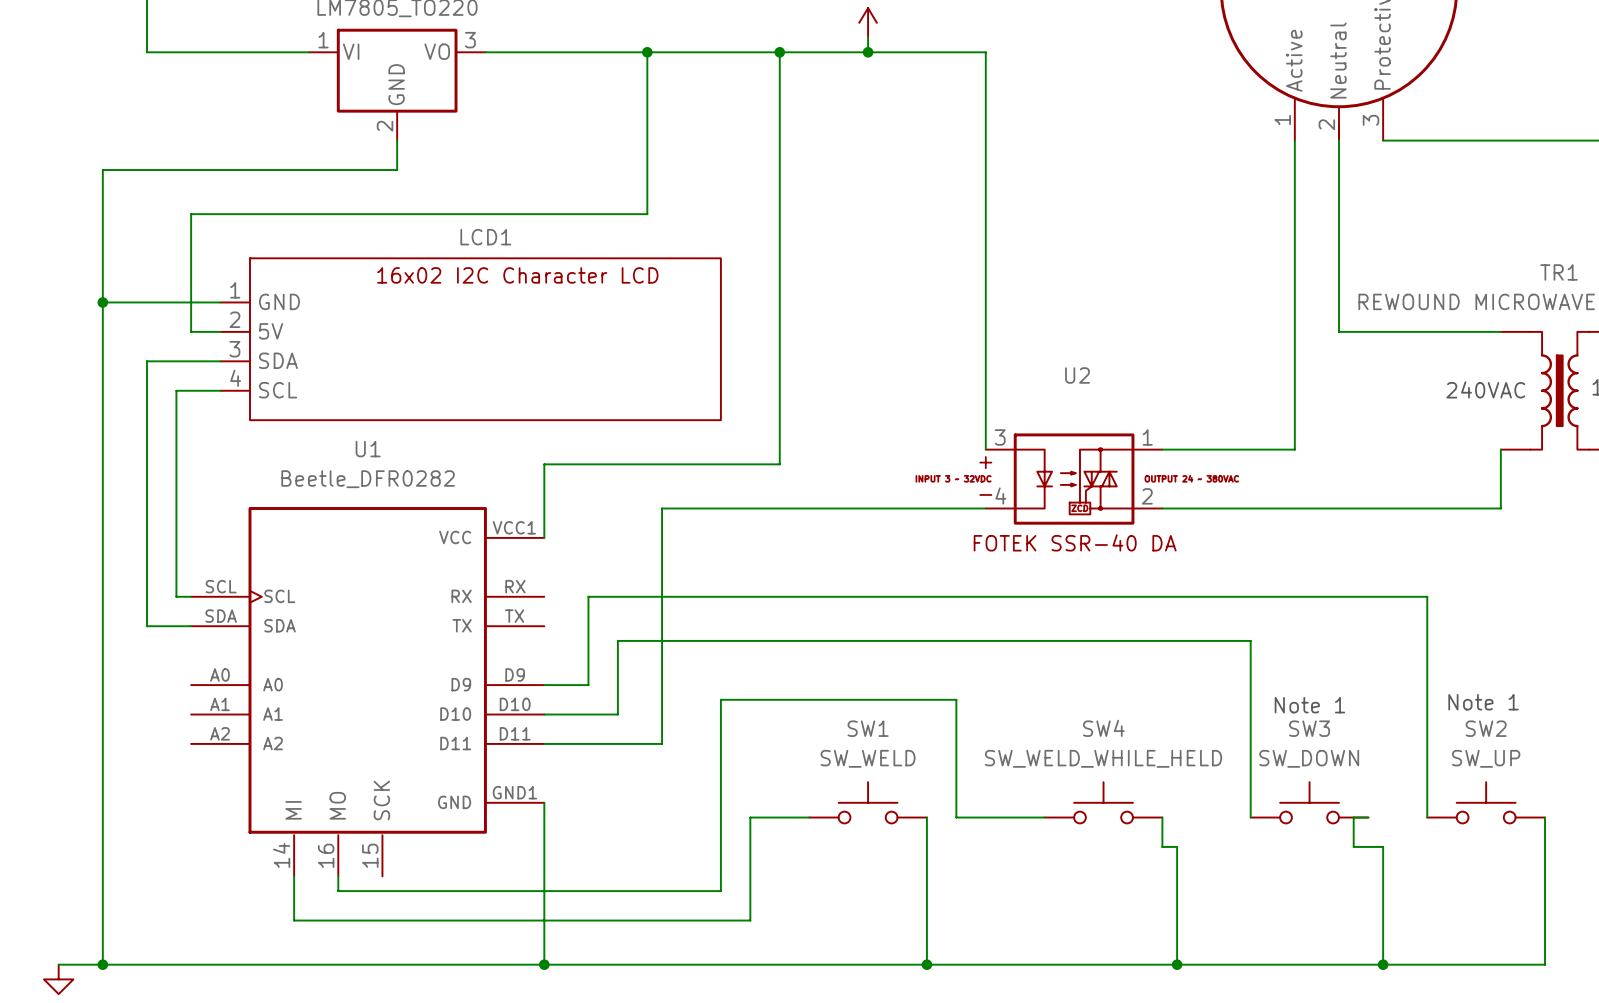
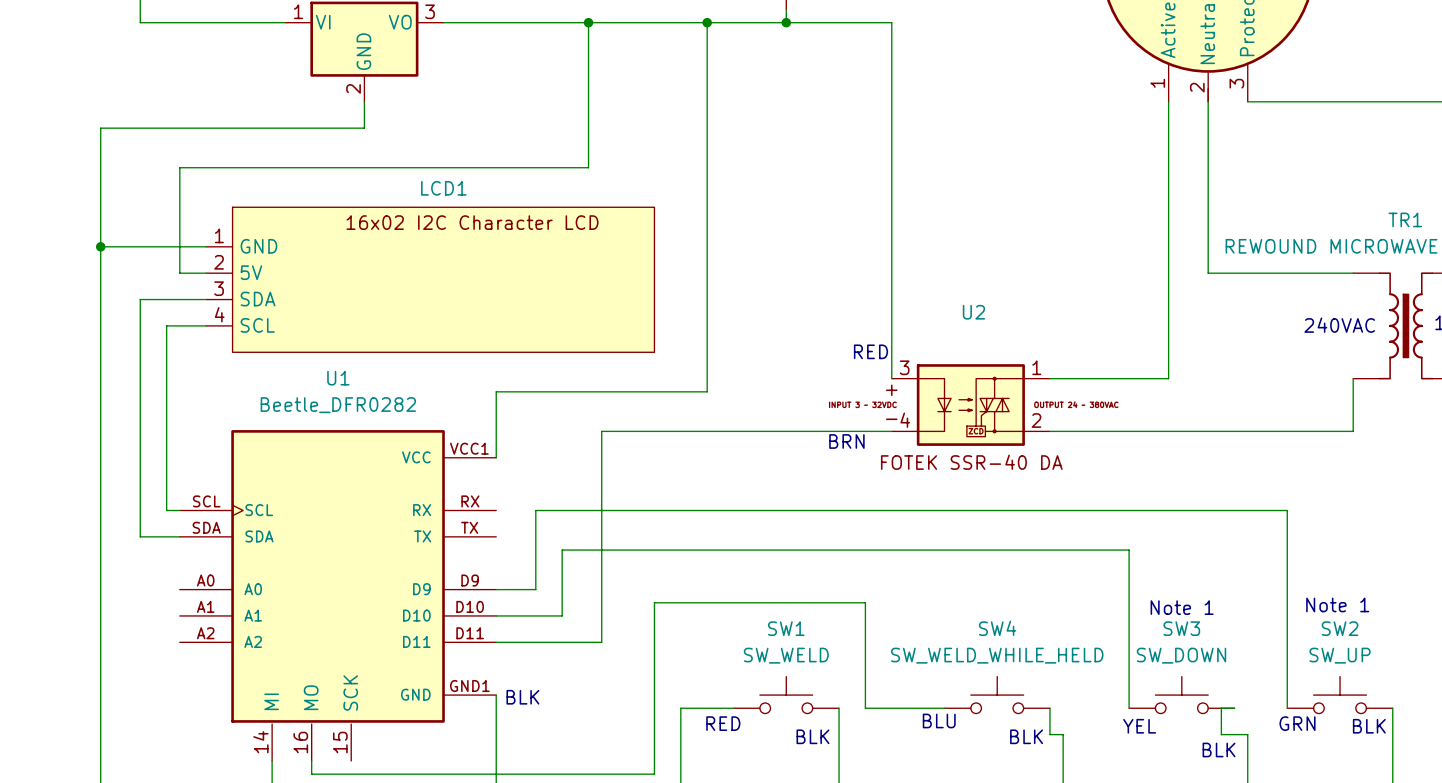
text: none -> RED (870, 351)
text: none -> BRN (846, 441)
text: none -> BLK (522, 697)
text: none -> BLU (939, 720)
text: none -> RED (723, 723)
text: none -> GRN (1297, 723)
text: none -> YEL (1139, 726)
text: none -> BLK (1369, 726)
text: none -> BLK (812, 736)
text: none -> BLK (1026, 736)
text: none -> BLK (1219, 749)

